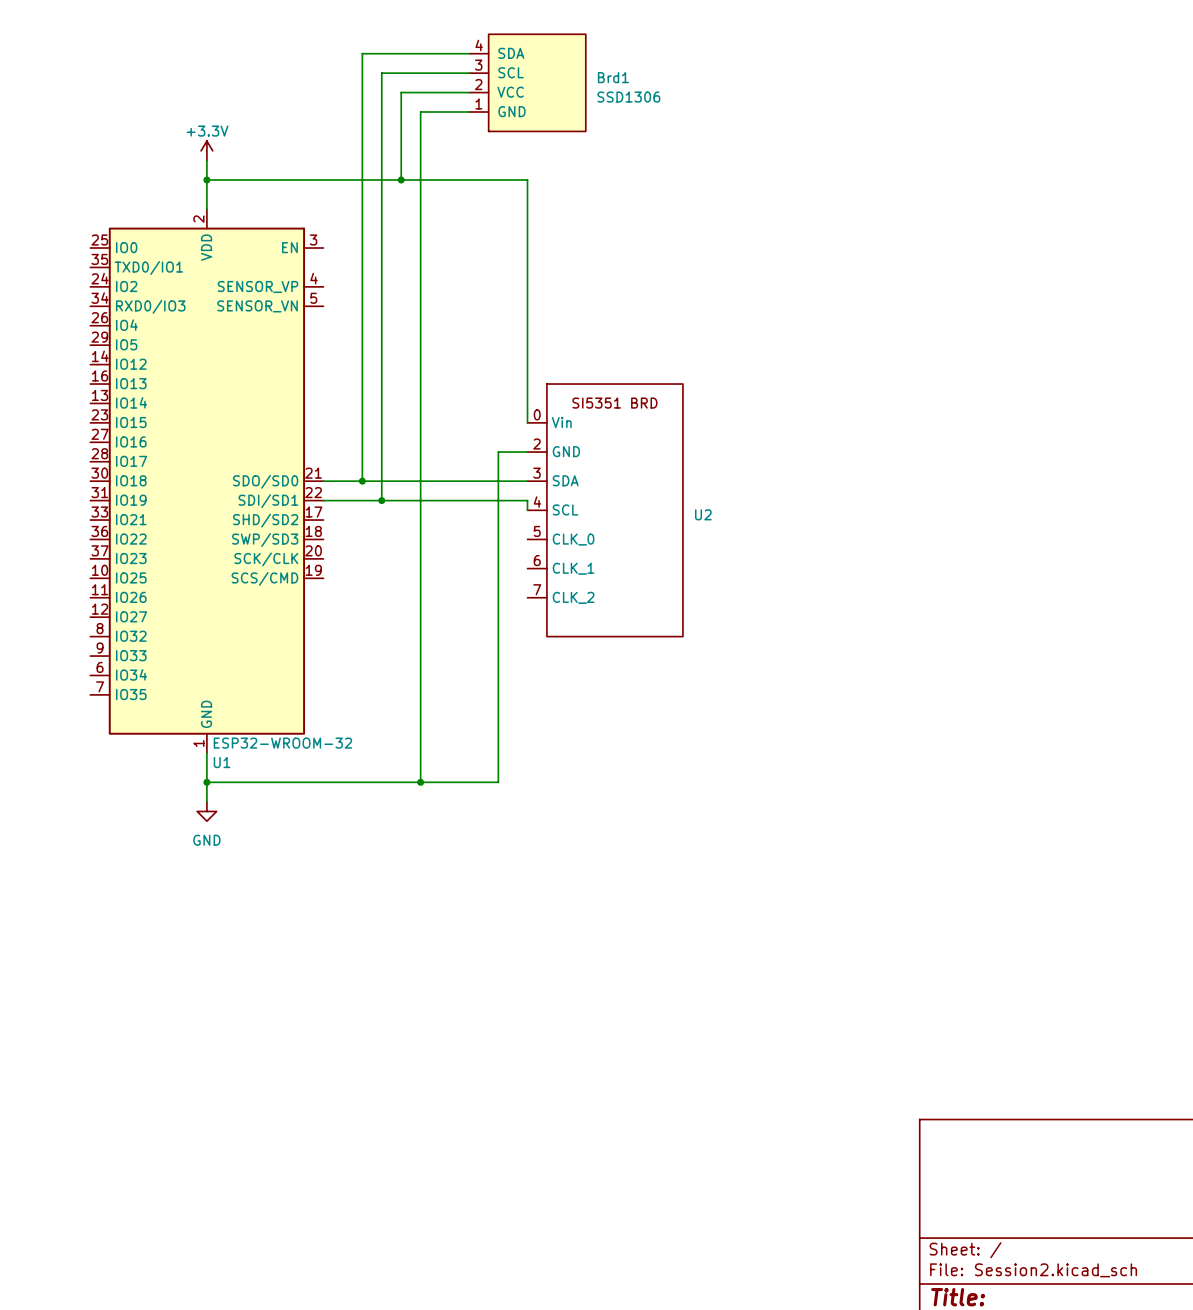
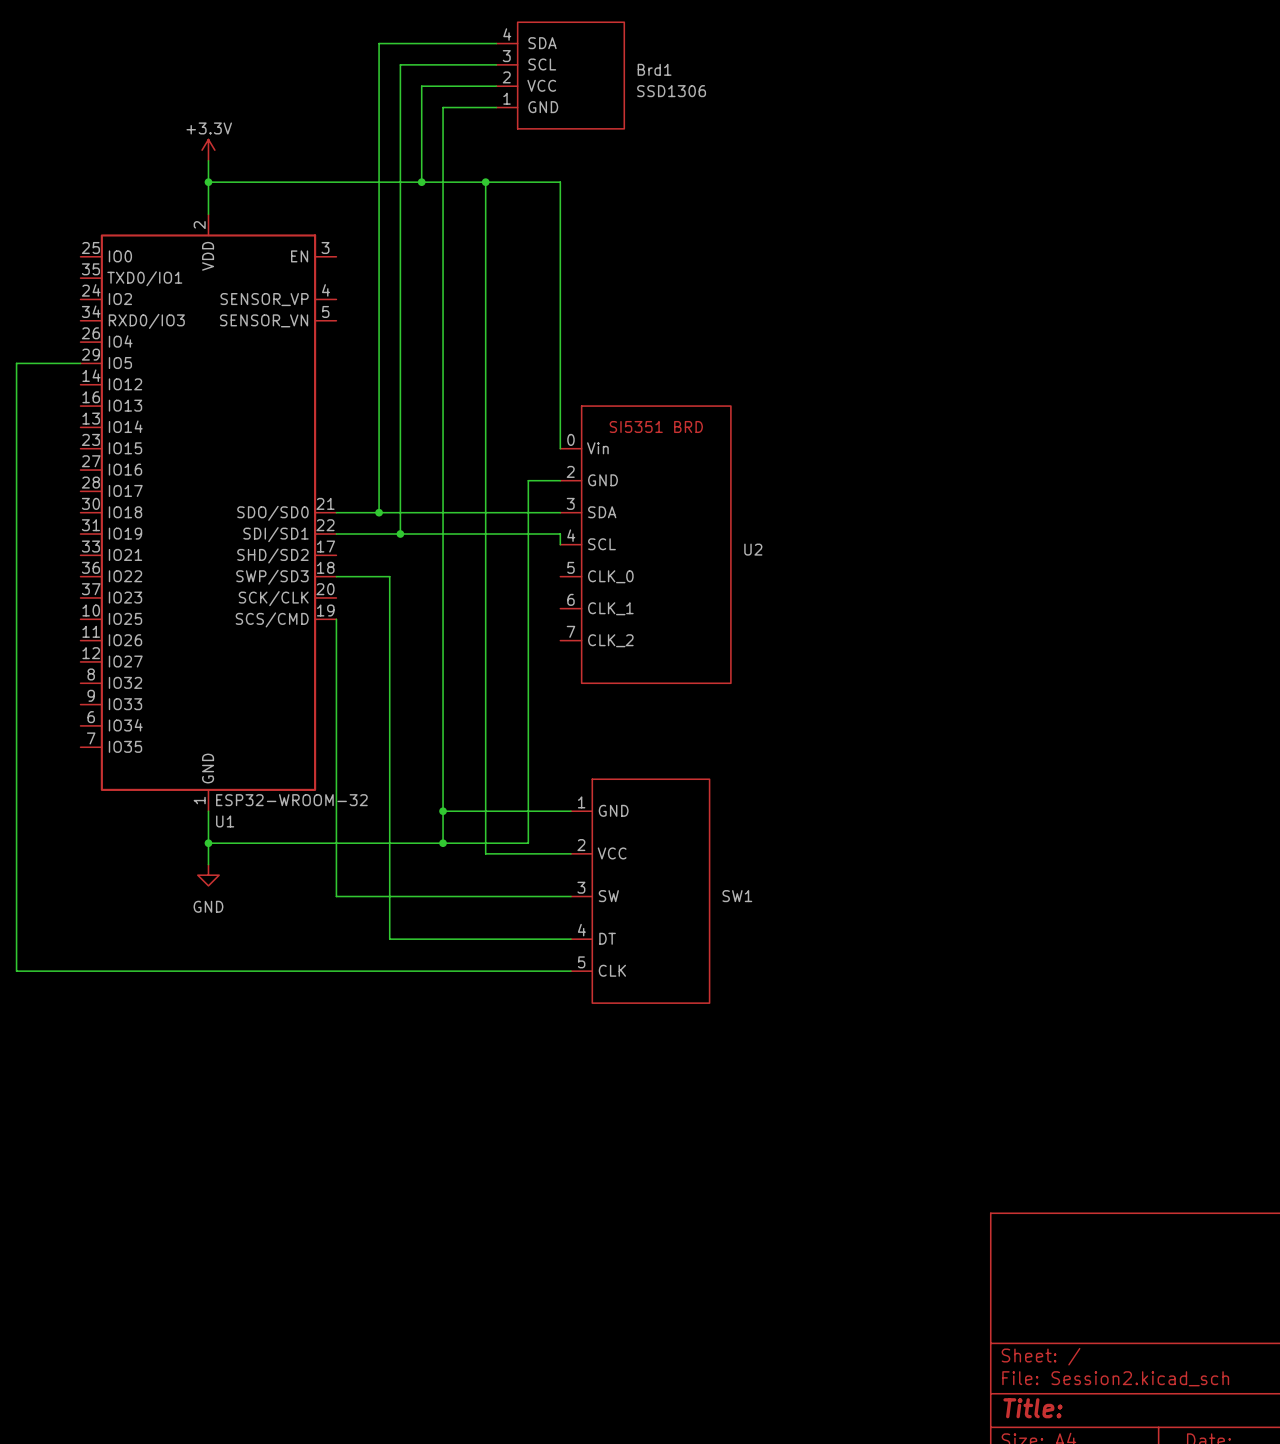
wire: none -> (485, 182) (485, 853) (570, 853)
junction: none -> (485, 182)
wire: none -> (80, 363) (16, 363) (16, 971) (570, 971)
wire: none -> (336, 576) (389, 576) (389, 939) (570, 939)
wire: none -> (336, 619) (336, 896) (570, 896)
wire: none -> (443, 811) (570, 811)
junction: none -> (443, 811)
SW1: none -> (640, 891)

